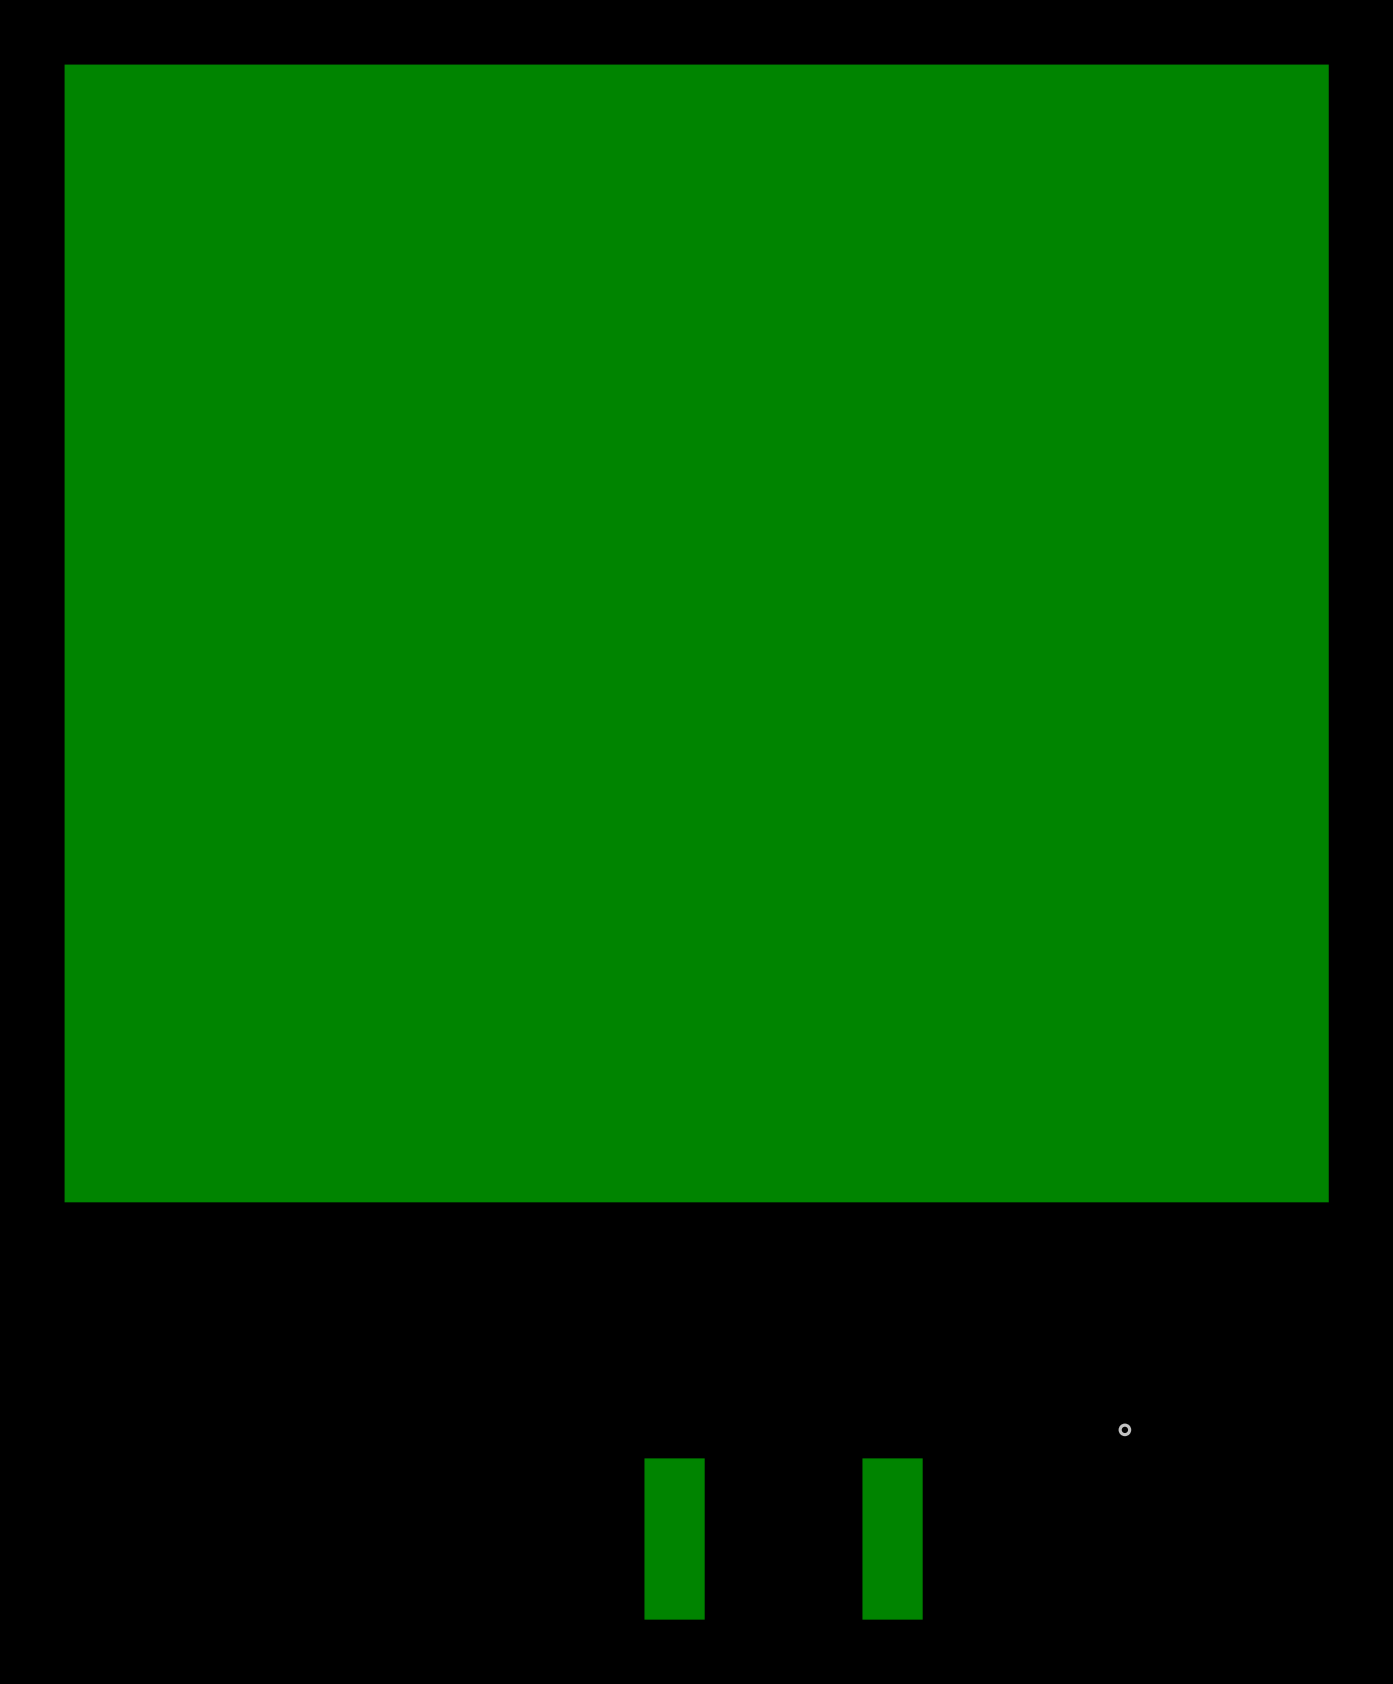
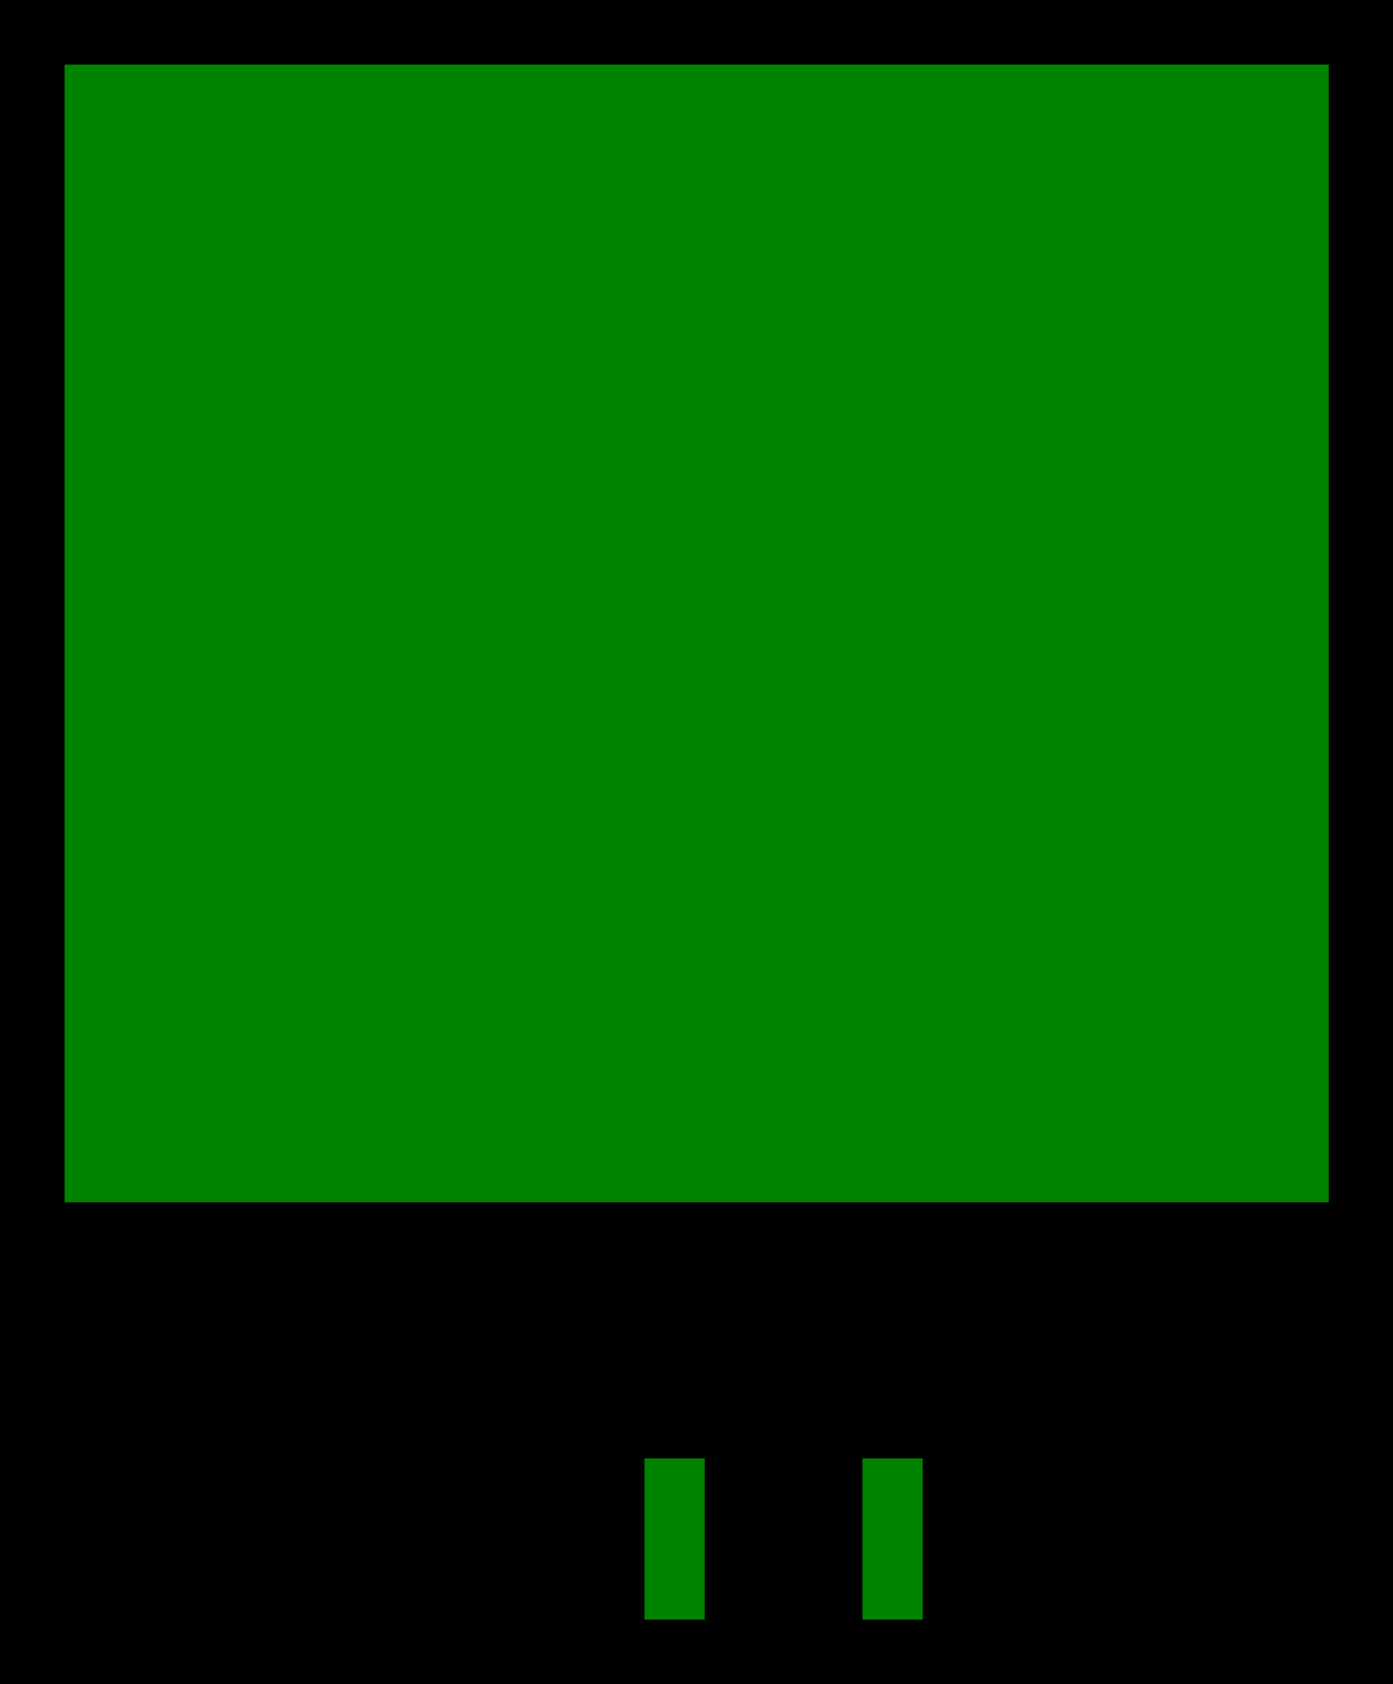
via: (1124, 1429) -> none

